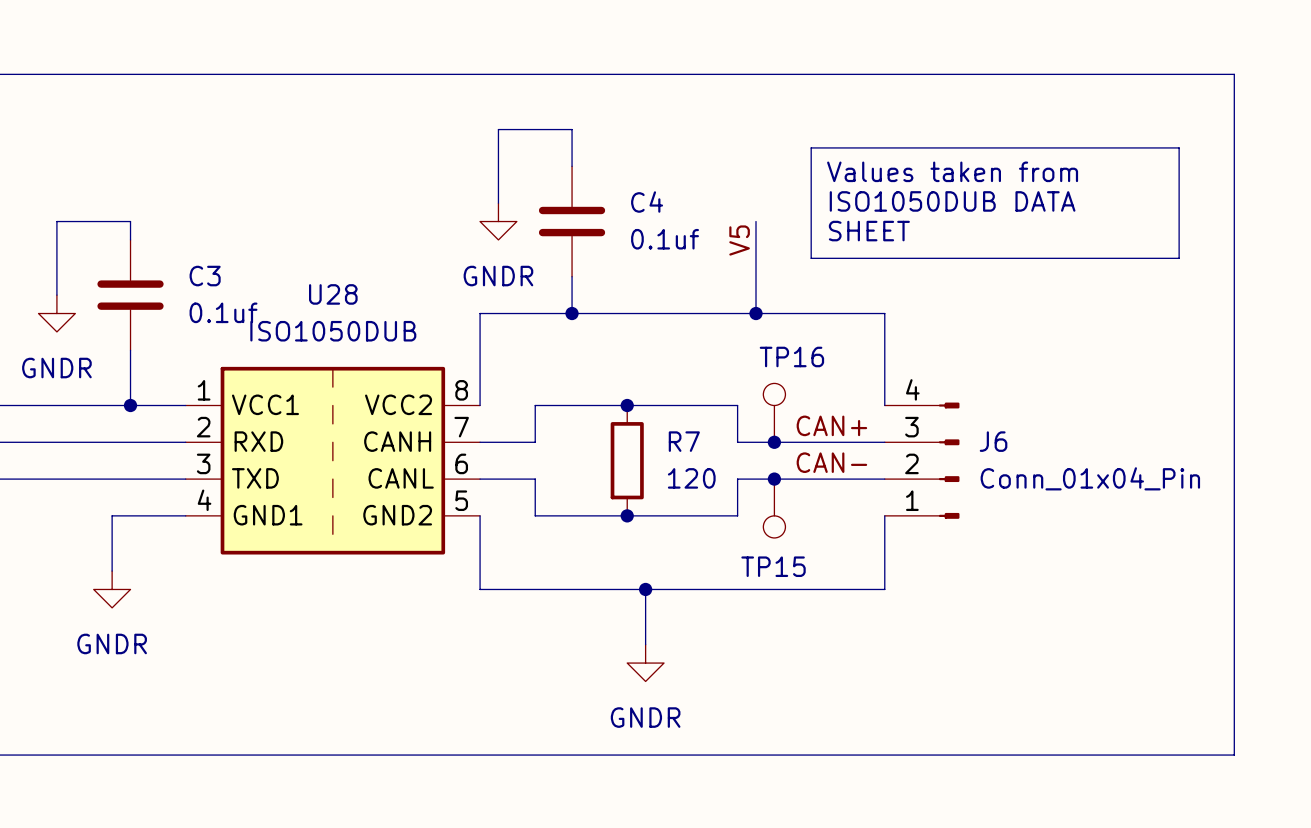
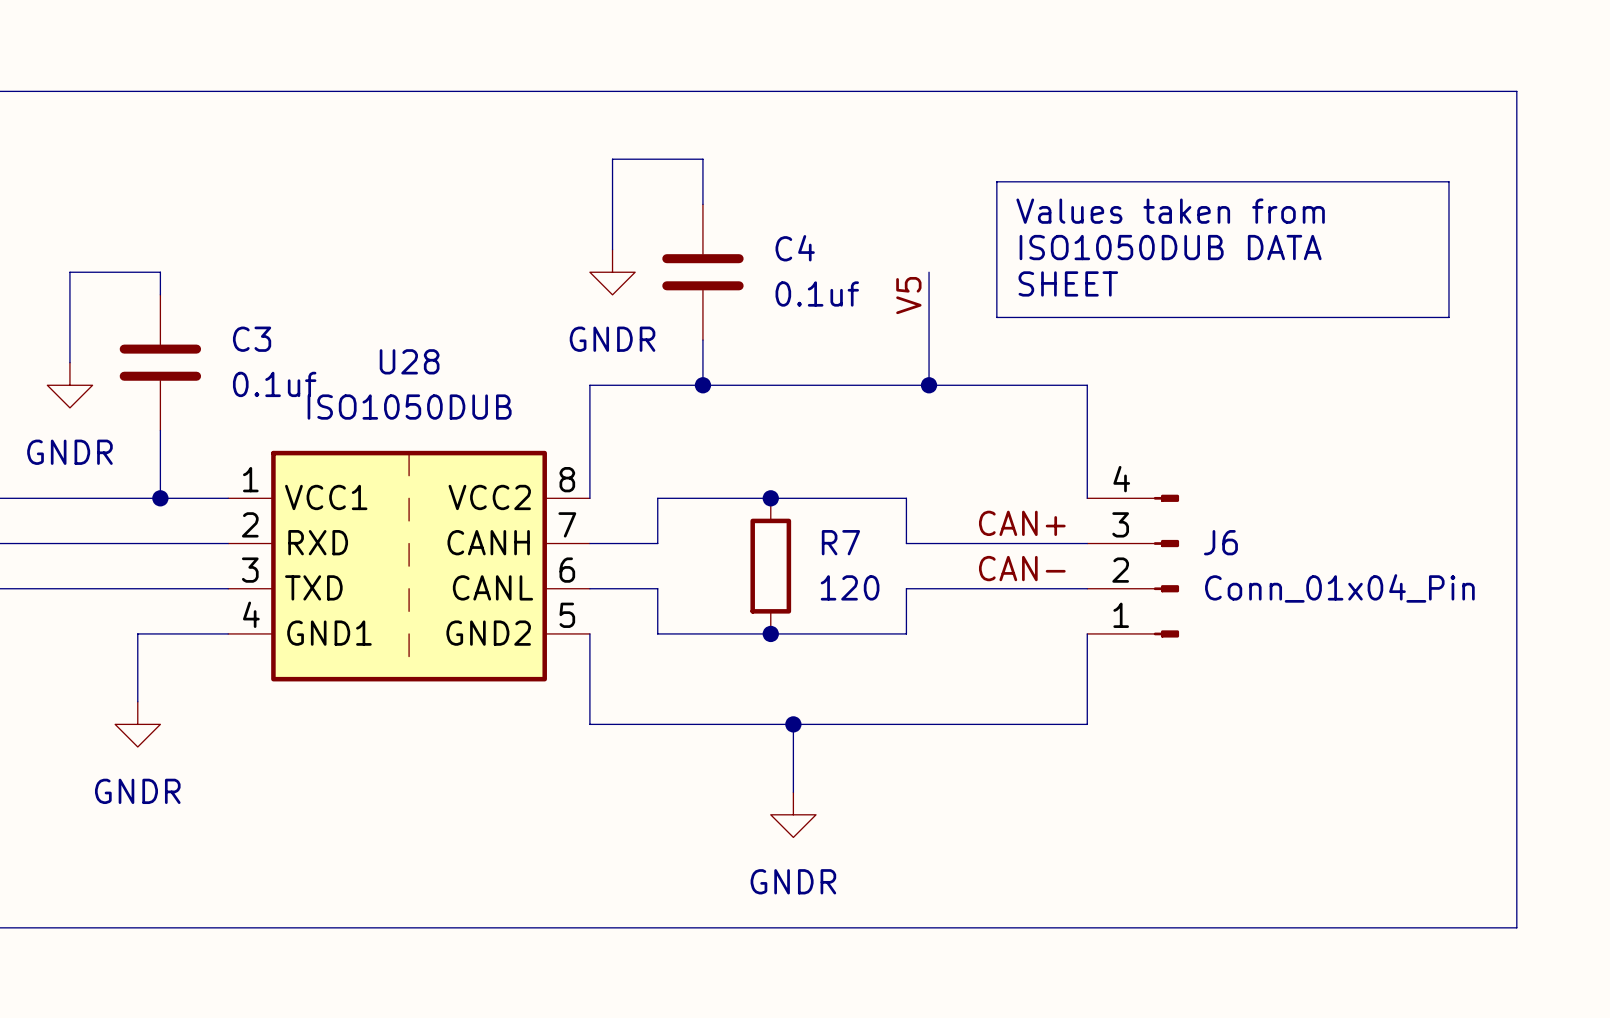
TP16: (774, 412) -> none
junction: (774, 442) -> none
junction: (774, 479) -> none
TP15: (774, 508) -> none

